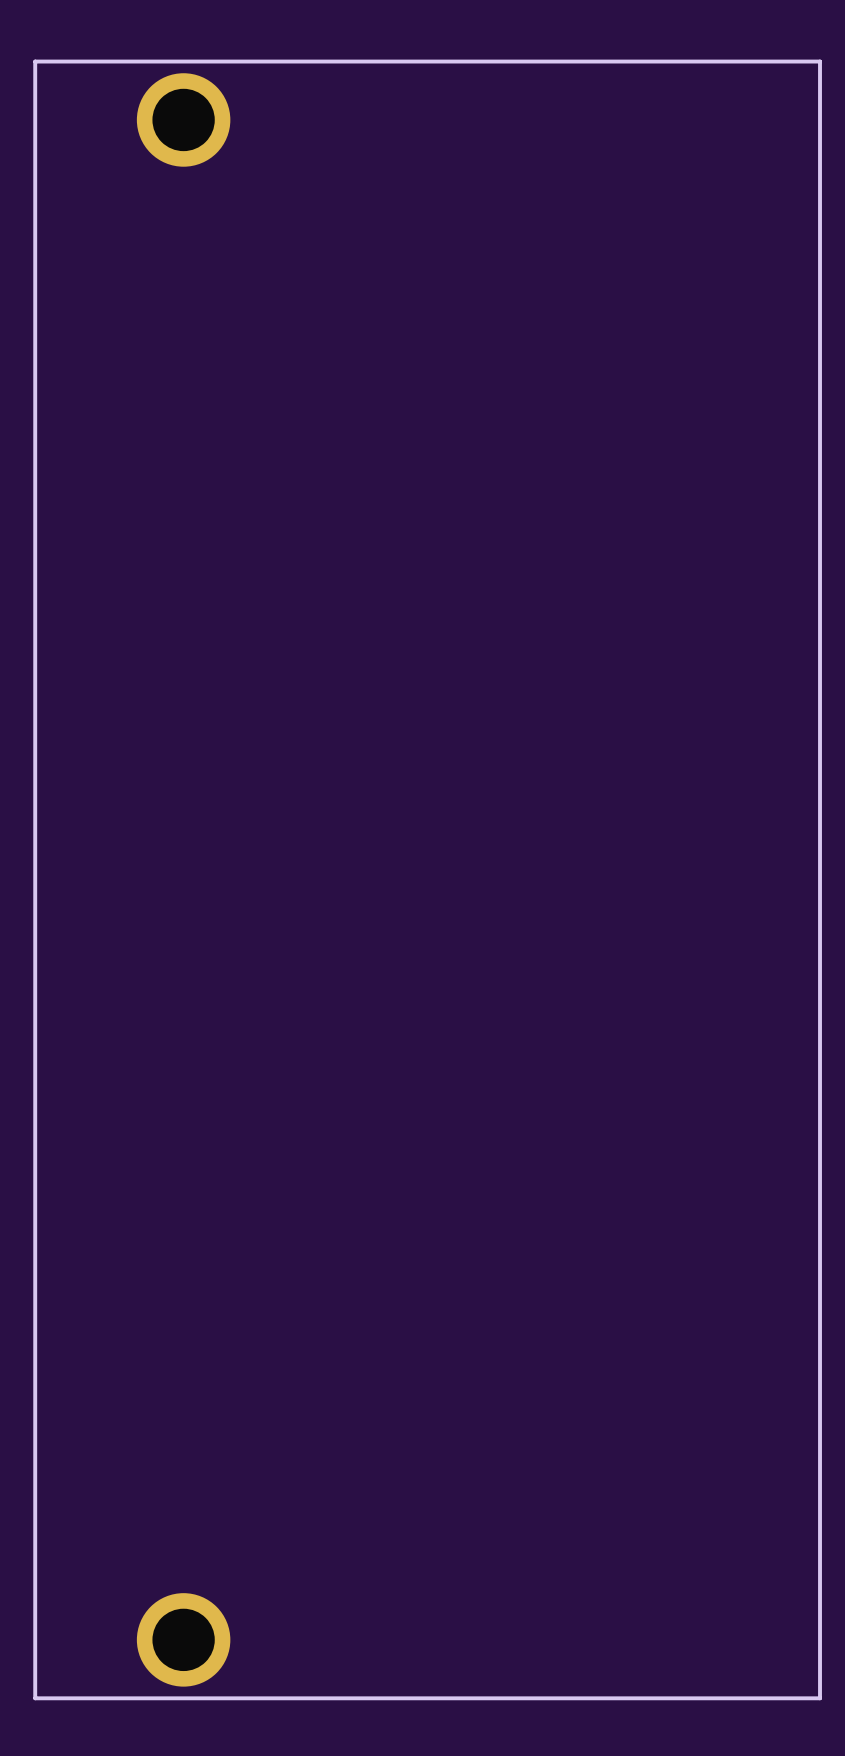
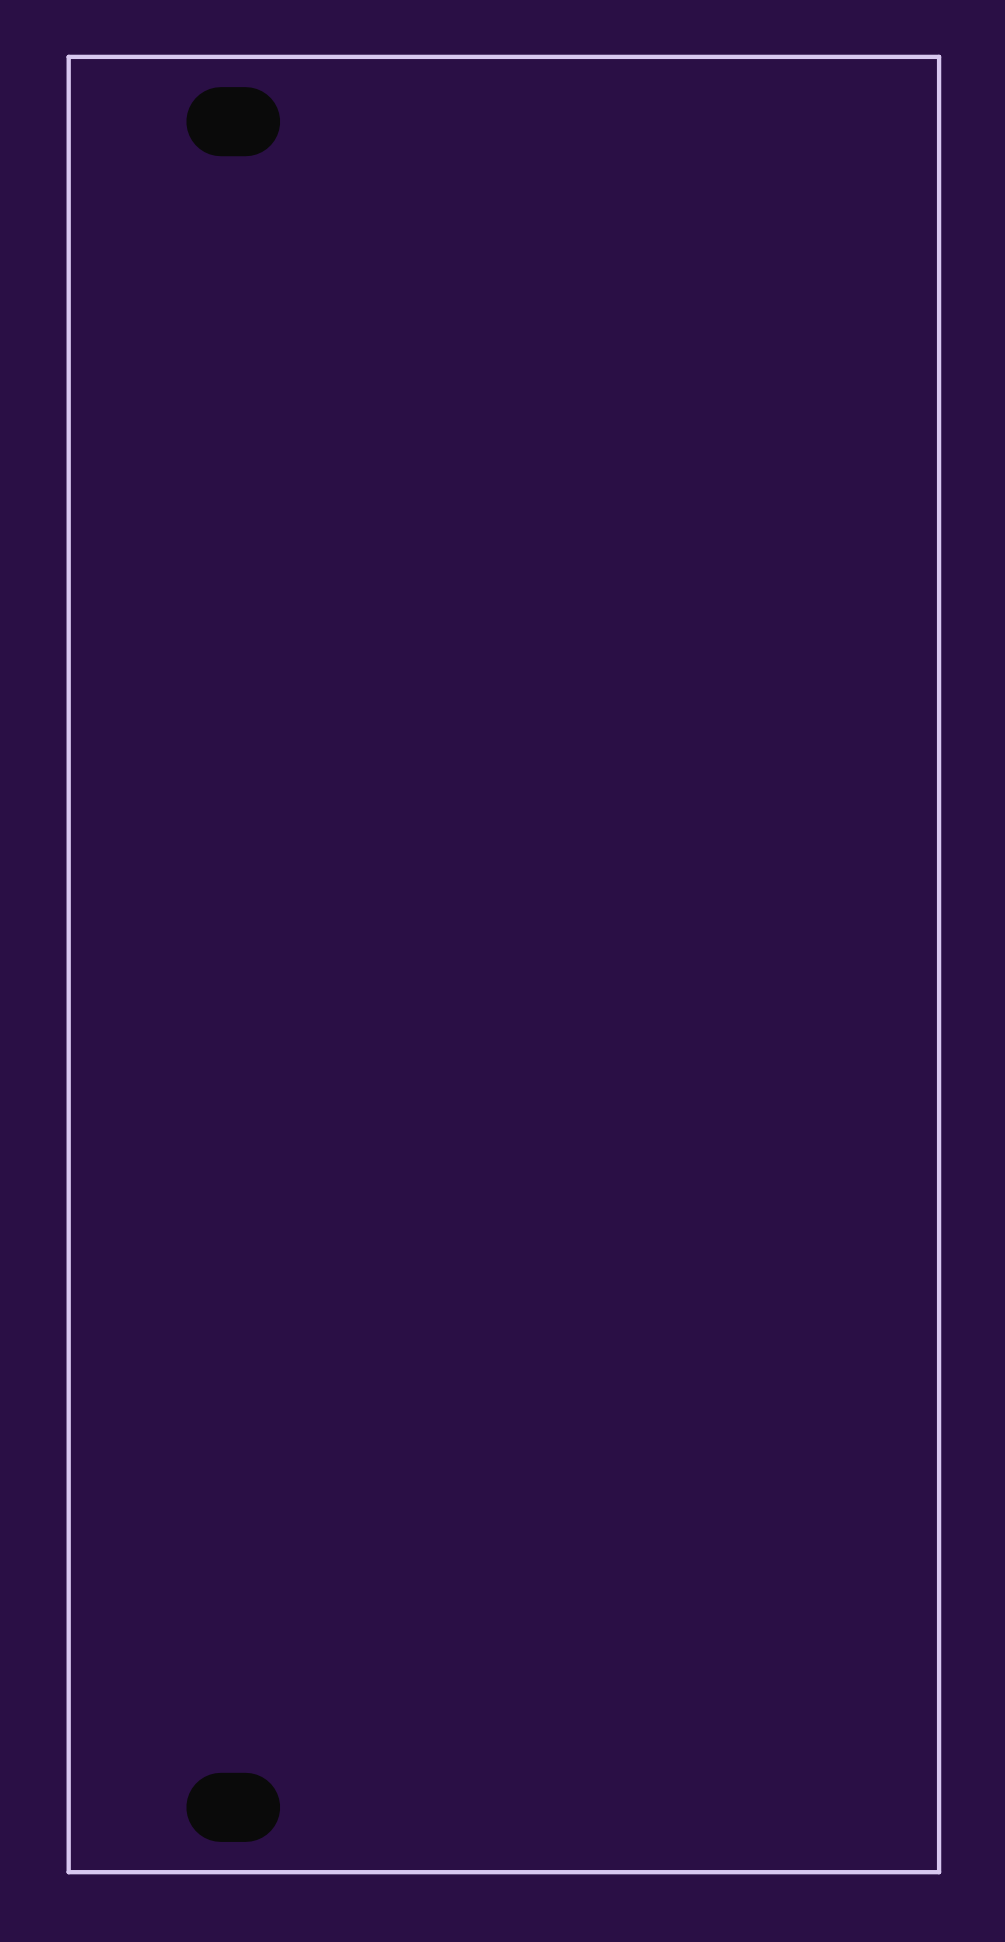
part footprint: [136, 73, 231, 167] -> [186, 87, 281, 157]
part footprint: [136, 1593, 231, 1687] -> [186, 1772, 281, 1842]

